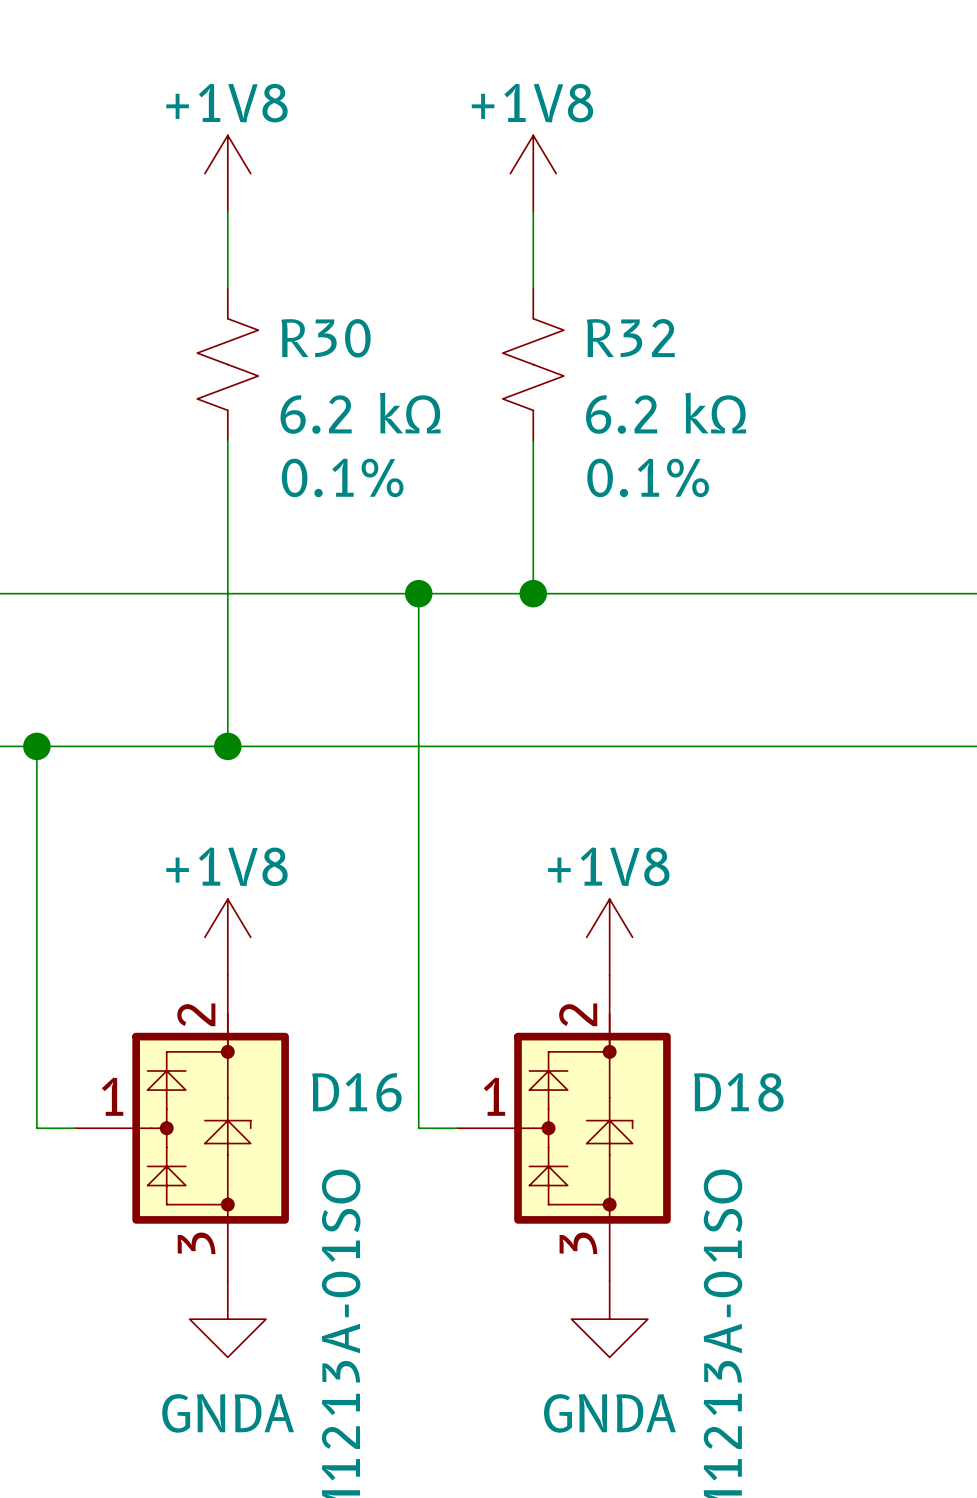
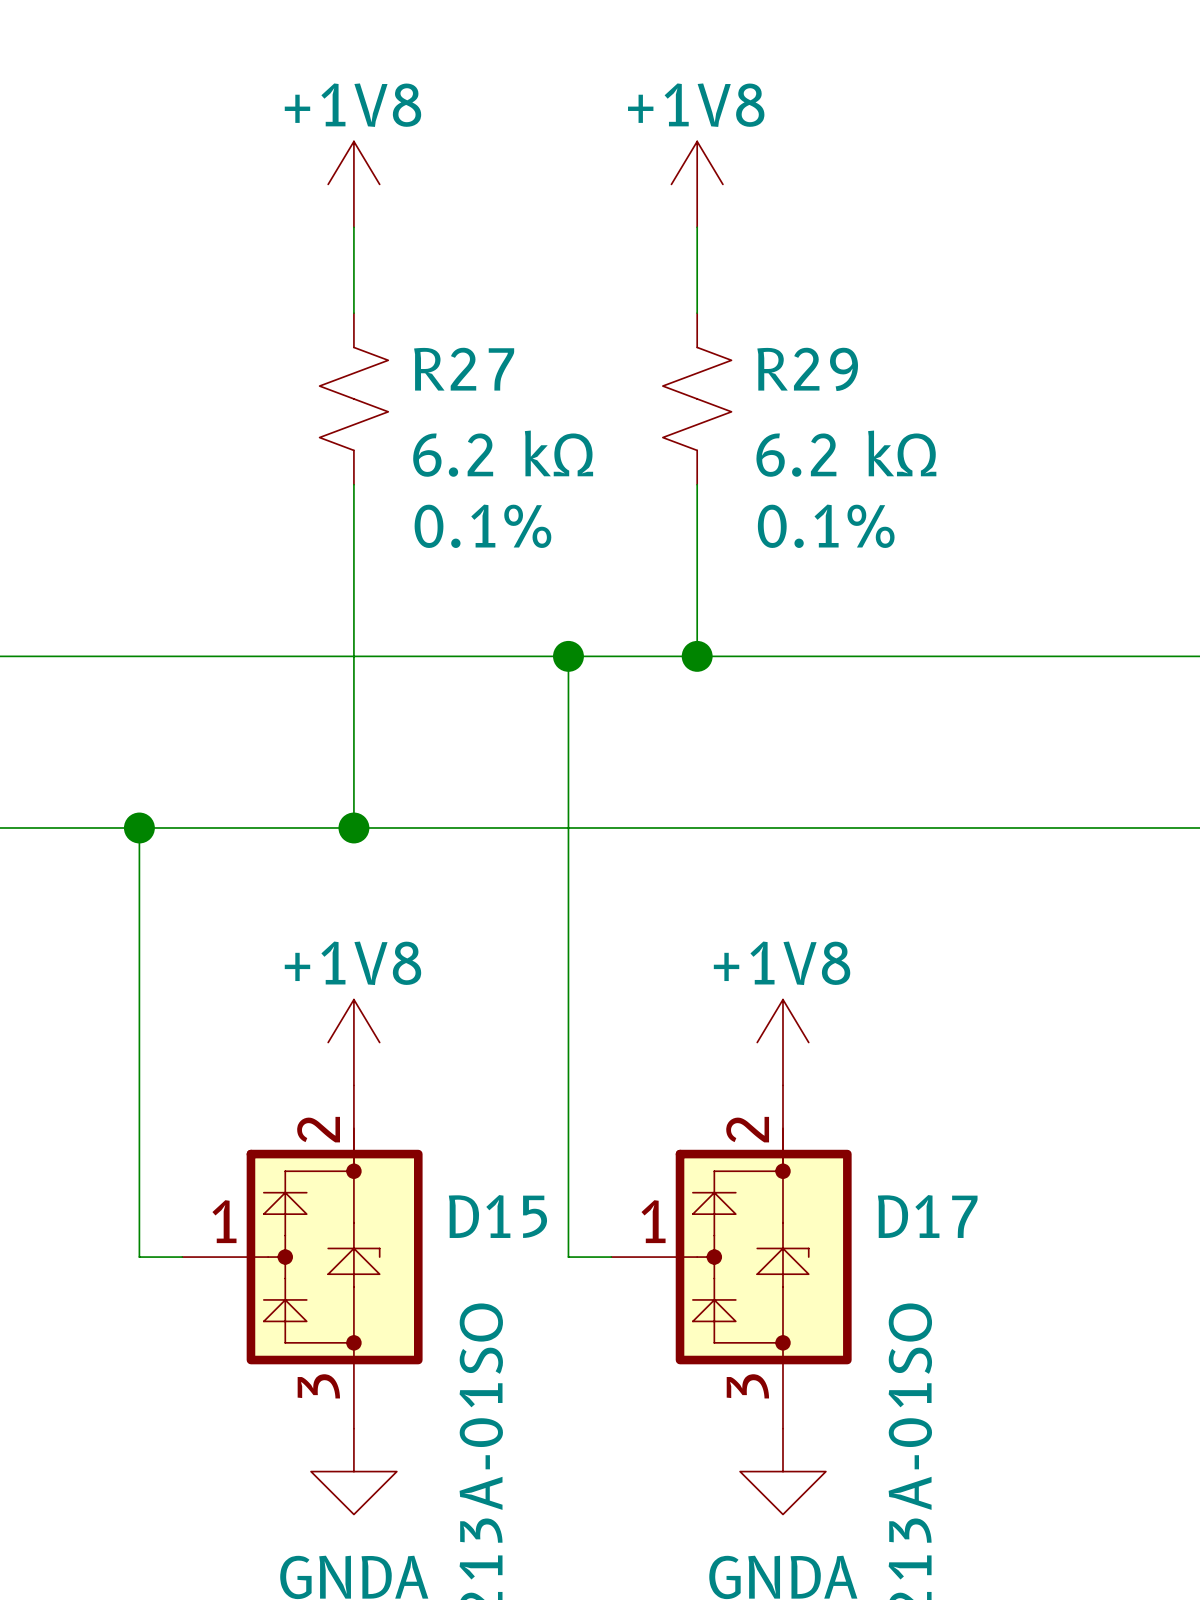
R30 name: R30 (326, 338) -> R27 (464, 369)
R32 name: R32 (630, 338) -> R29 (807, 369)
D16 name: D16 (356, 1092) -> D15 (497, 1216)
D18 name: D18 (738, 1092) -> D17 (927, 1216)

